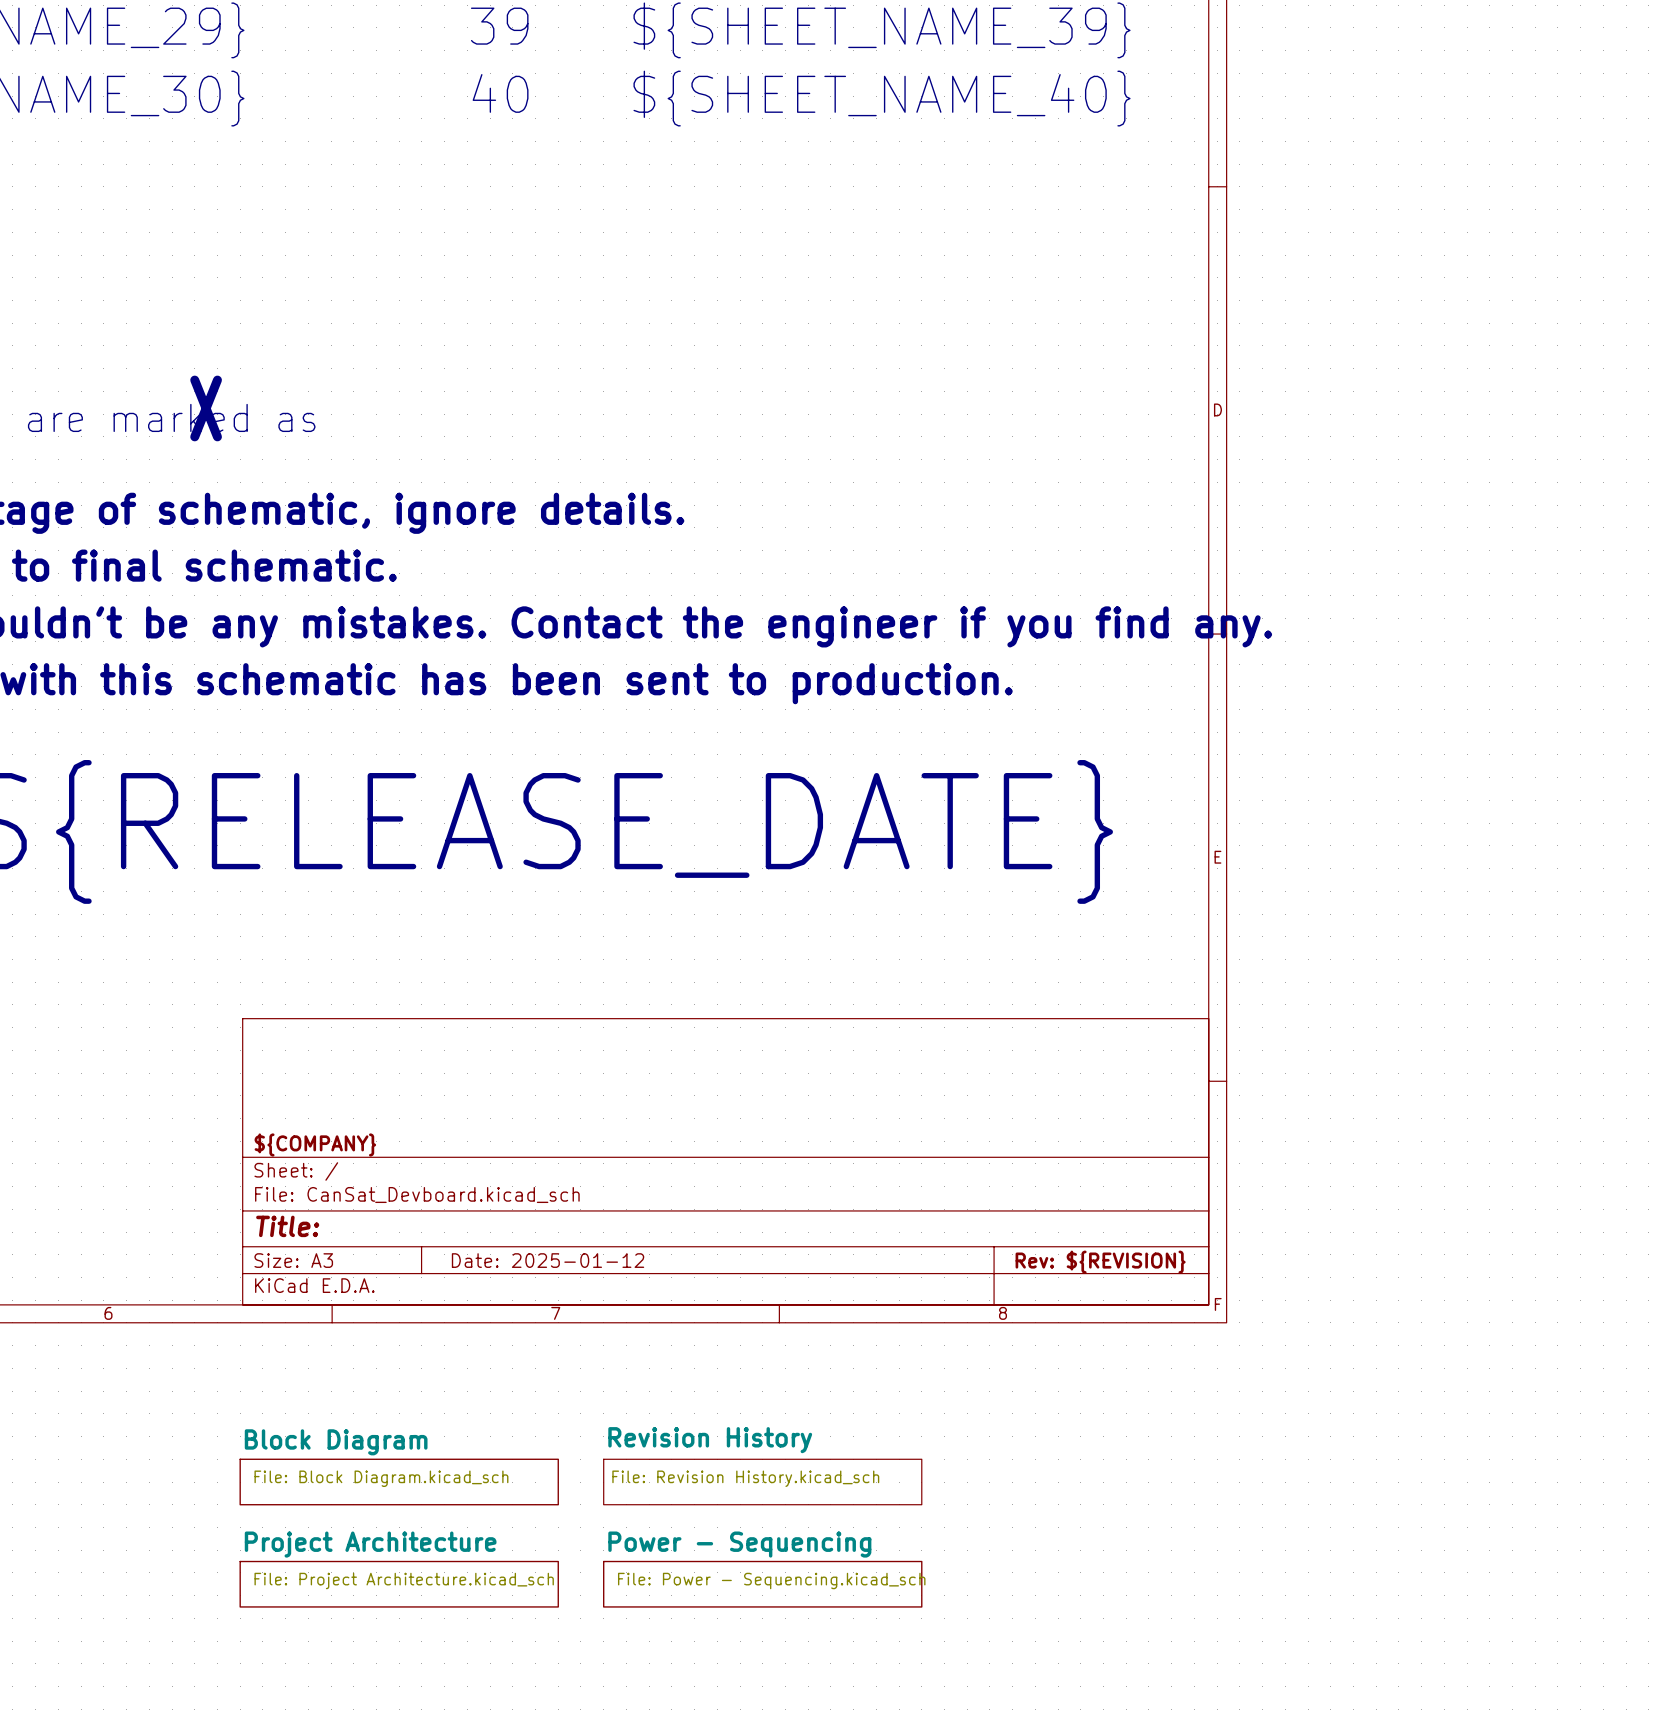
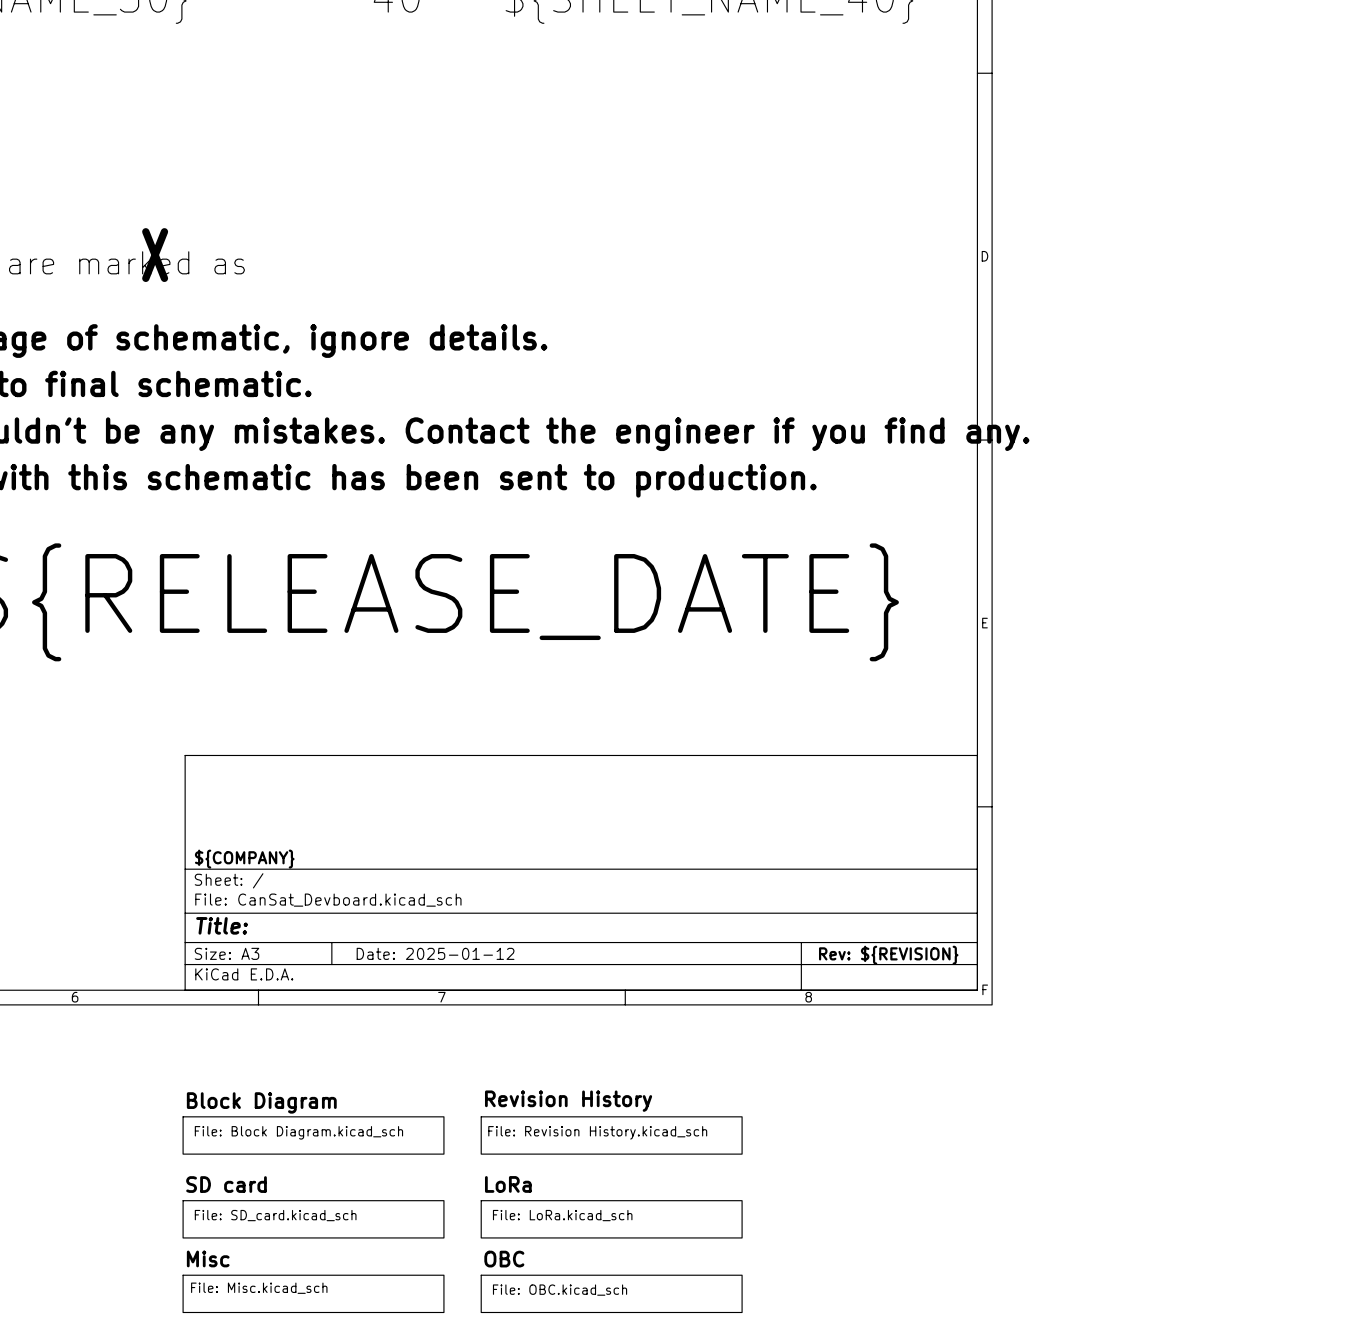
sheet Project Architecture name: Project Architecture (370, 1544) -> SD card (226, 1184)
sheet Power - Sequencing name: Power - Sequencing (739, 1544) -> LoRa (508, 1184)
sheet Project Architecture value: File: Project Architecture.kicad_sch (404, 1580) -> File: SD_card.kicad_sch (275, 1215)
sheet Power - Sequencing value: File: Power - Sequencing.kicad_sch (771, 1580) -> File: LoRa.kicad_sch (562, 1215)
sheet Misc: none -> File: Misc.kicad_sch (313, 1293)
sheet OBC: none -> File: OBC.kicad_sch (611, 1293)

